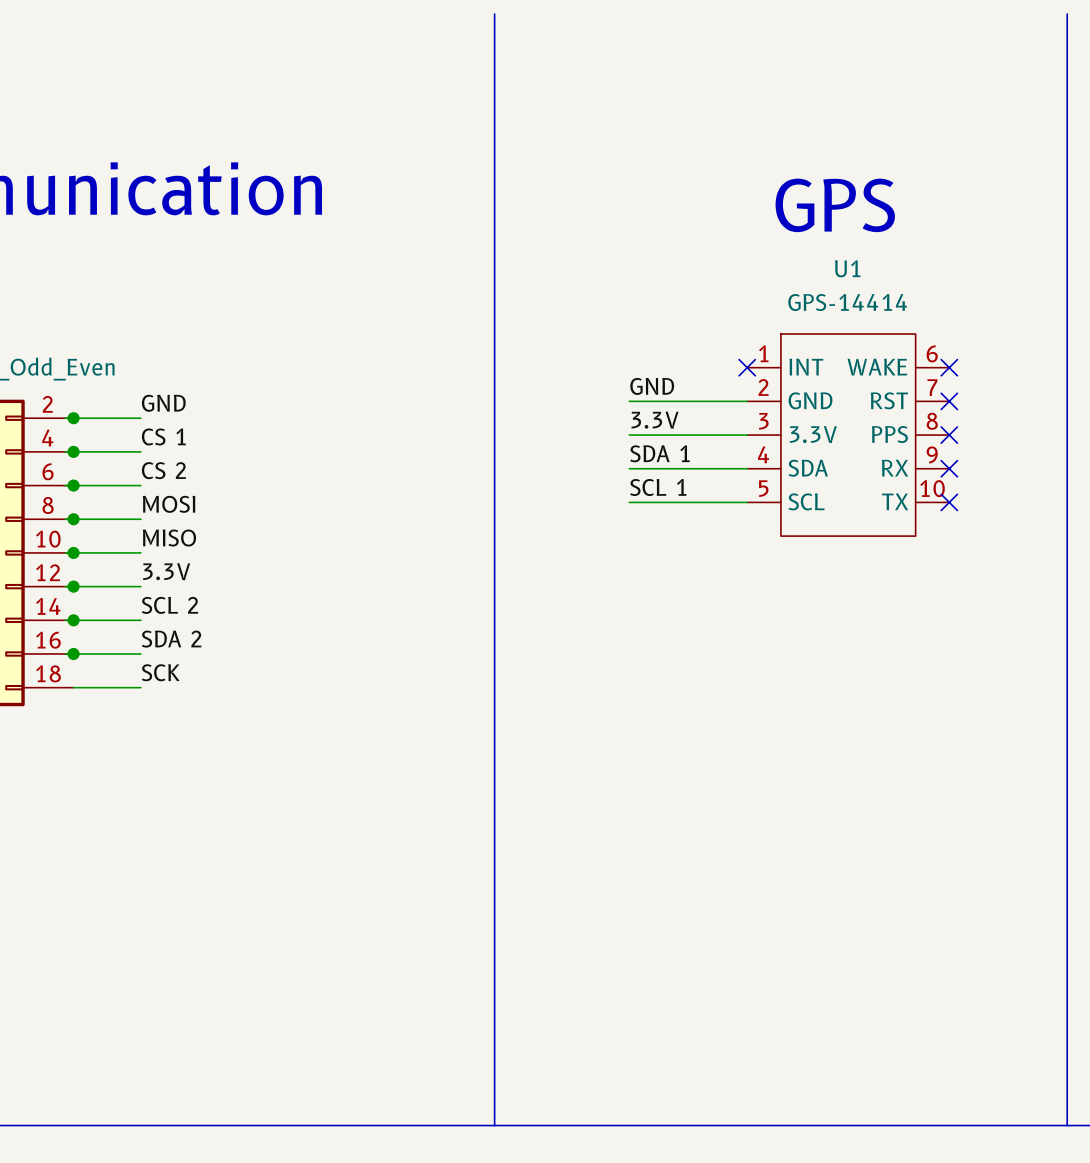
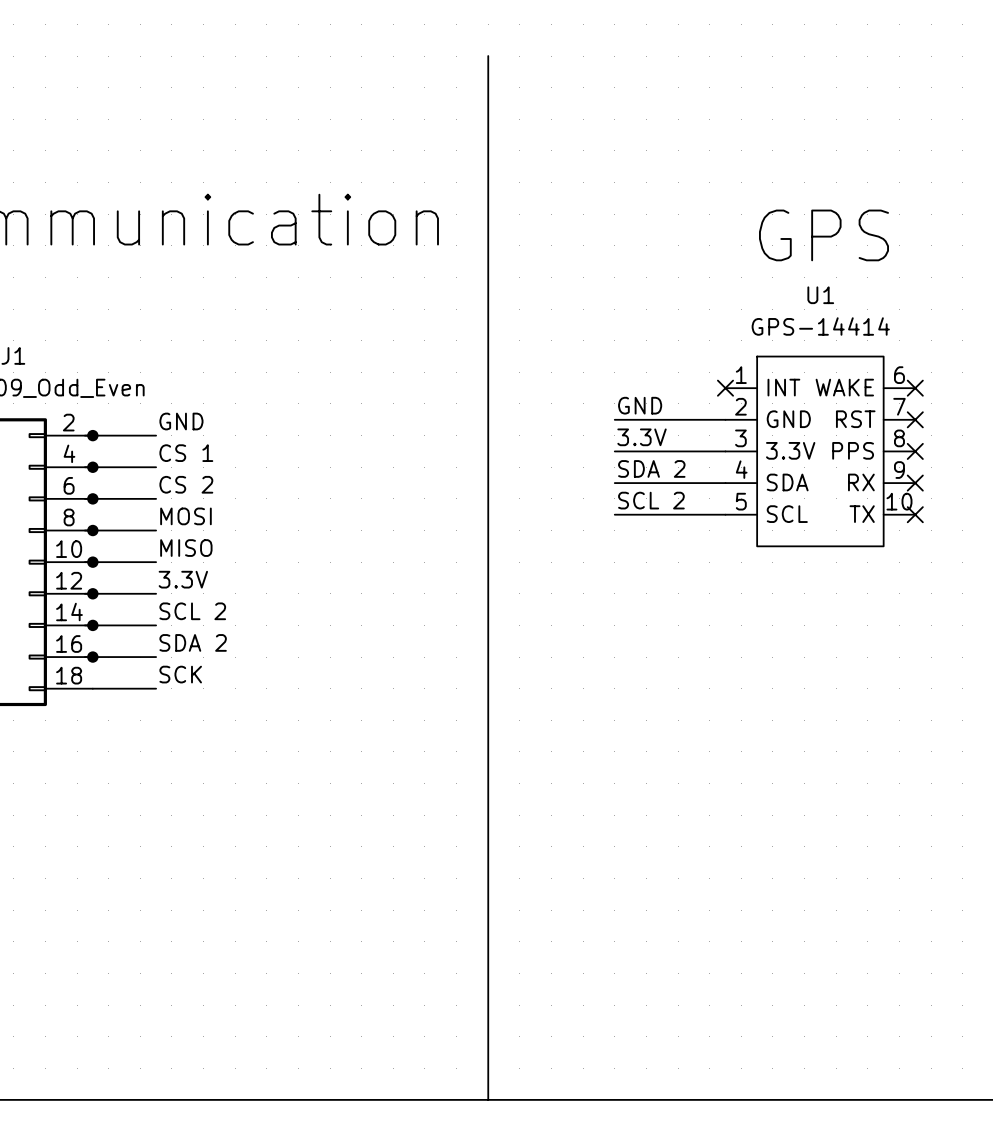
label: SDA 1 (659, 453) -> SDA 2 (651, 468)
label: SCL 1 (658, 487) -> SCL 2 (651, 500)

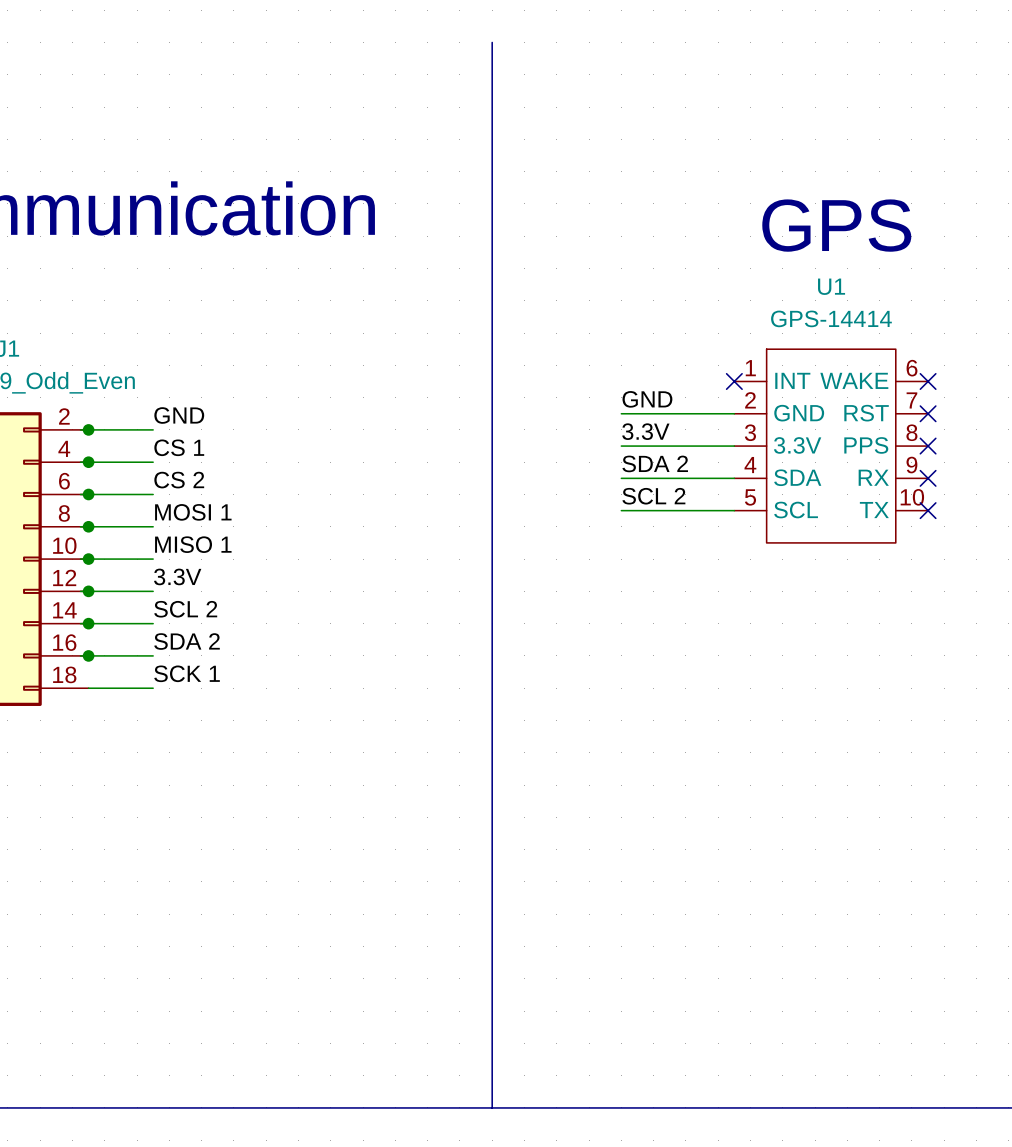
label: MOSI (185, 516) -> MOSI 1 (193, 512)
label: MISO (186, 548) -> MISO 1 (193, 544)
label: SCK (180, 674) -> SCK 1 (187, 673)

